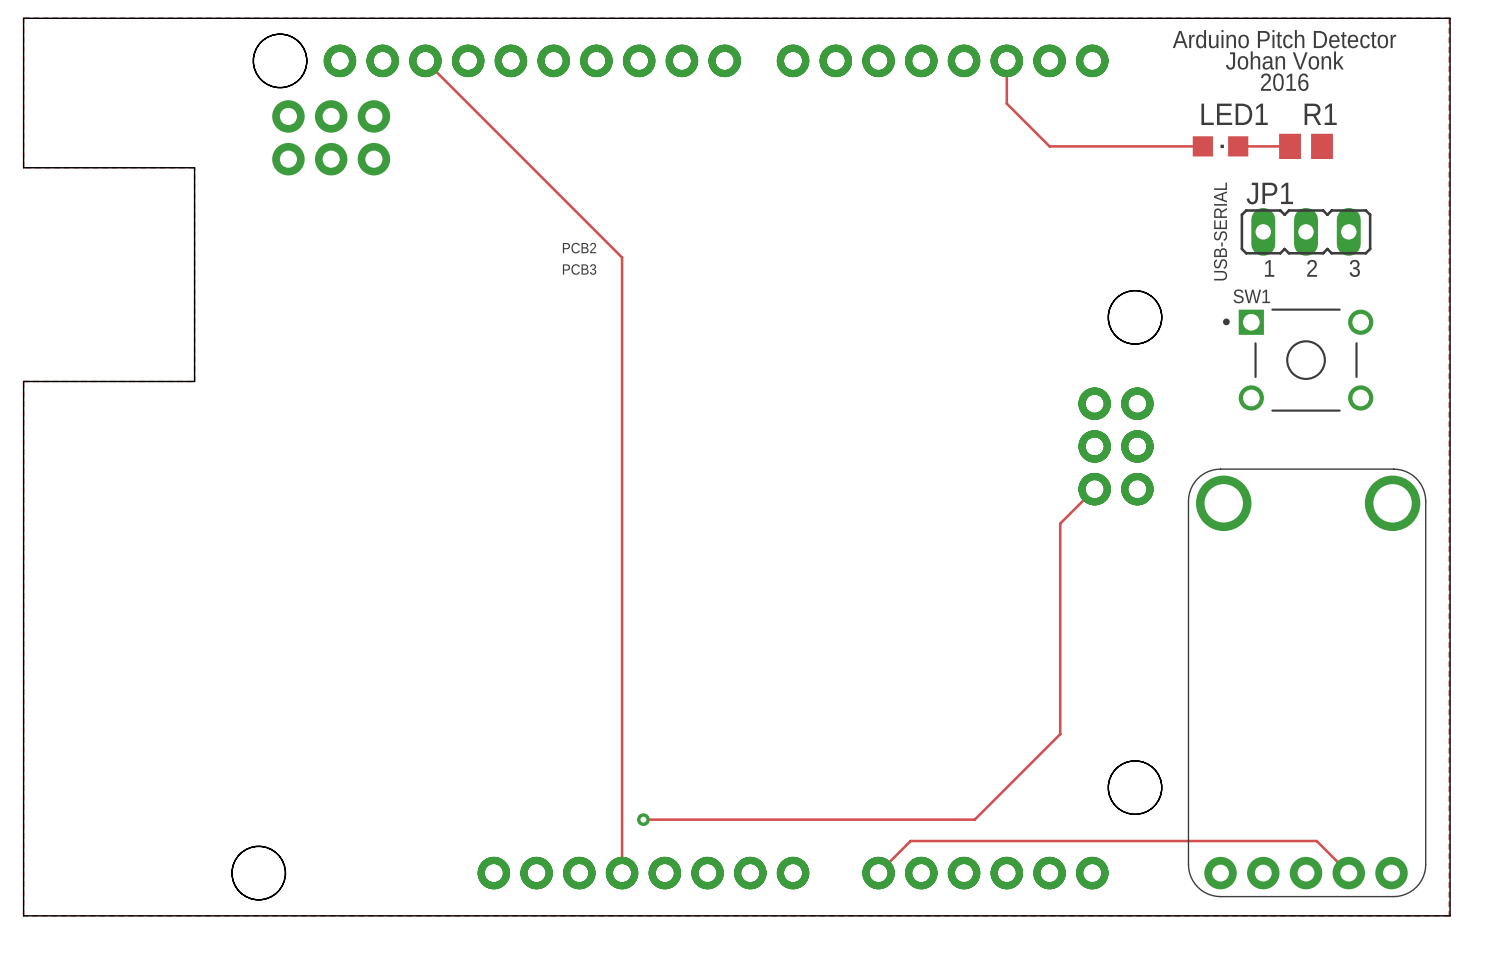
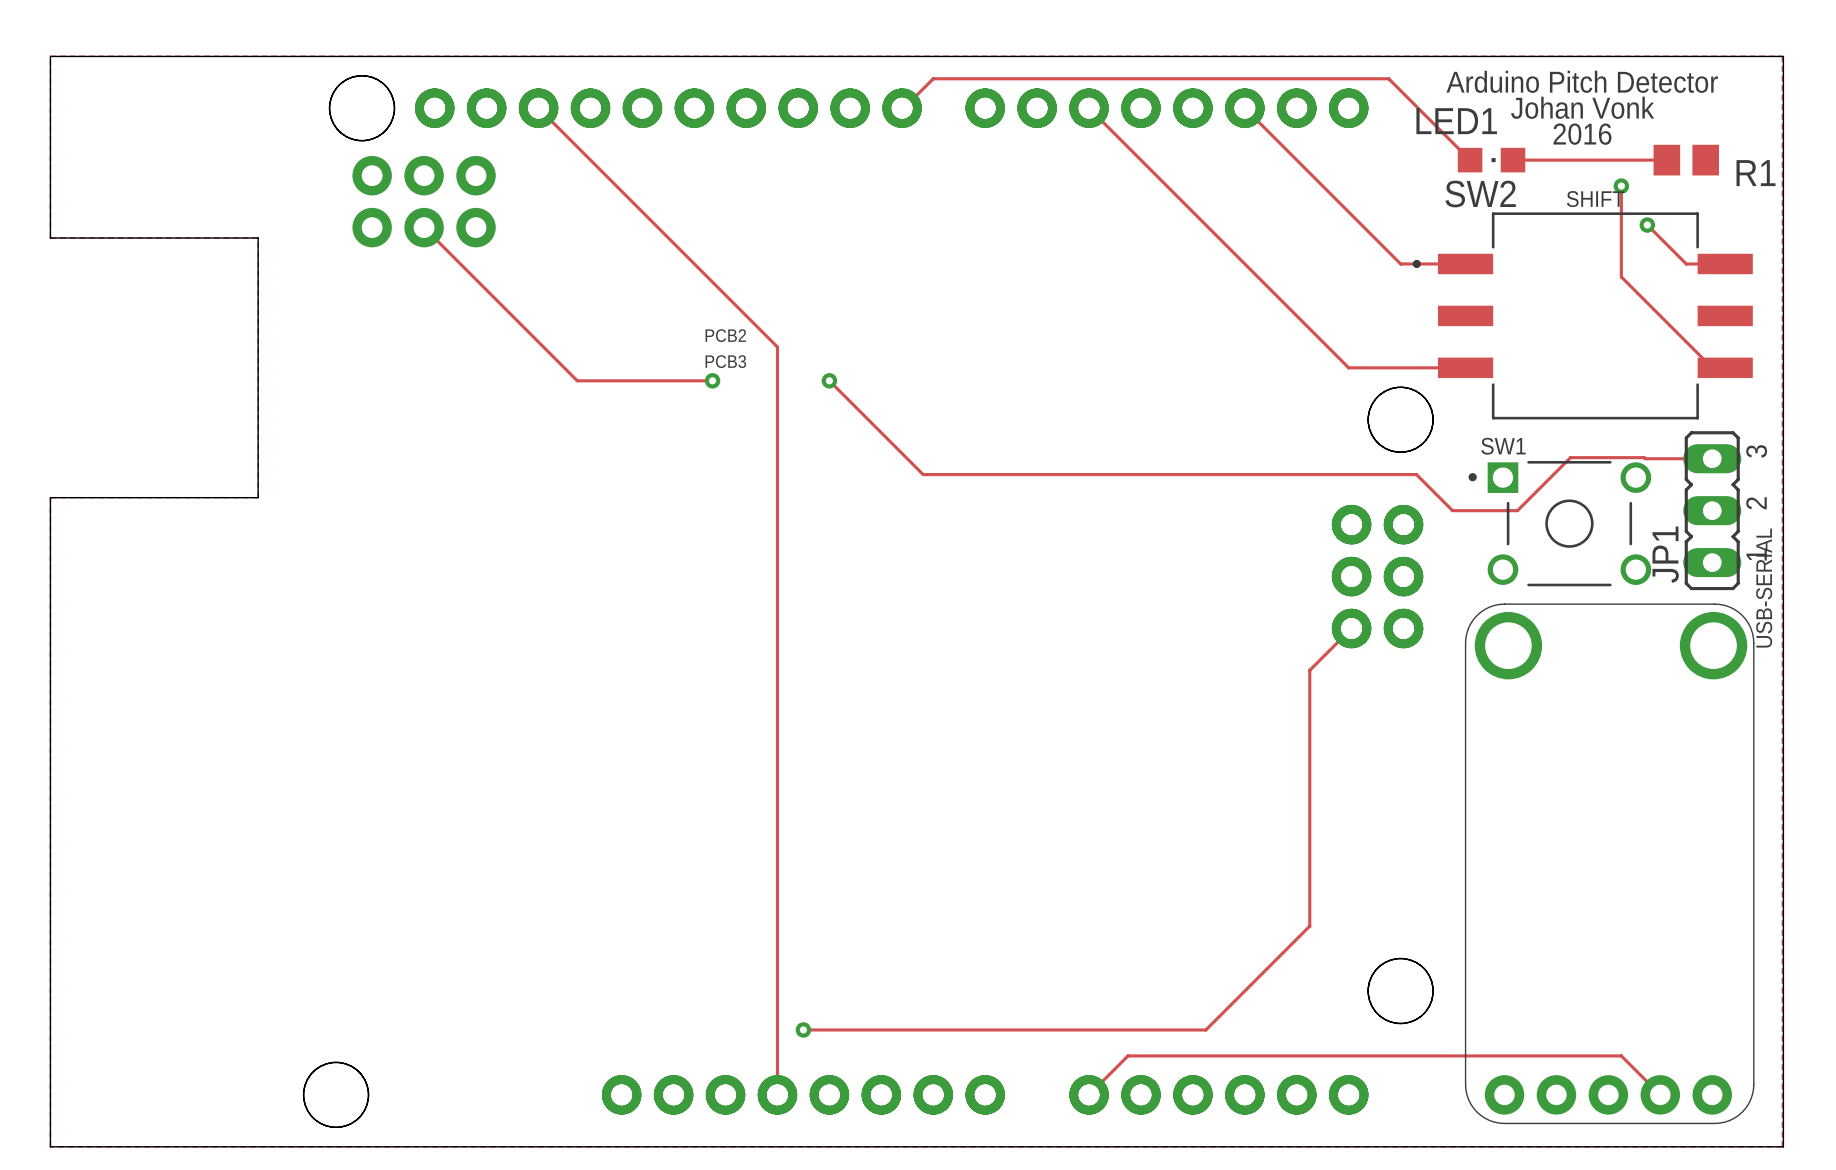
track: none -> (902, 108) (933, 78) (1388, 78) (1470, 160)
track: none -> (1089, 108) (1348, 367) (1465, 367)
track: (1006, 60) (1006, 103) (1049, 146) (1202, 146) -> (1244, 108) (1400, 263) (1465, 263)
track: none -> (1513, 160) (1666, 160)
LED1 name position: LED1 (1234, 114) -> LED1 (1456, 121)
R1 name position: R1 (1320, 114) -> R1 (1756, 173)
track: none -> (1621, 186) (1621, 276) (1712, 367) (1725, 367)
via: none -> (1621, 186)
text: none -> SHIFT (1595, 199)
LED1 position: (1220, 146) -> (1491, 160)
track: (1238, 146) (1290, 146) -> none
R1 position: (1306, 146) -> (1686, 160)
track: none -> (1647, 225) (1686, 263) (1725, 263)
via: none -> (1647, 225)
track: none -> (424, 227) (577, 380) (712, 380)
text position: USB-SERIAL (1220, 231) -> USB-SERIAL (1764, 588)
SW2: none -> (1582, 315)
JP1 rotation: 0° (1306, 231) -> 90° counterclockwise (1712, 510)
JP1 position: (1306, 231) -> (1712, 510)
via: none -> (712, 380)
track: none -> (829, 380) (923, 474) (1416, 474) (1452, 510) (1517, 510) (1570, 457) (1712, 458)
via: none -> (829, 380)
SW1 position: (1298, 360) -> (1559, 523)

